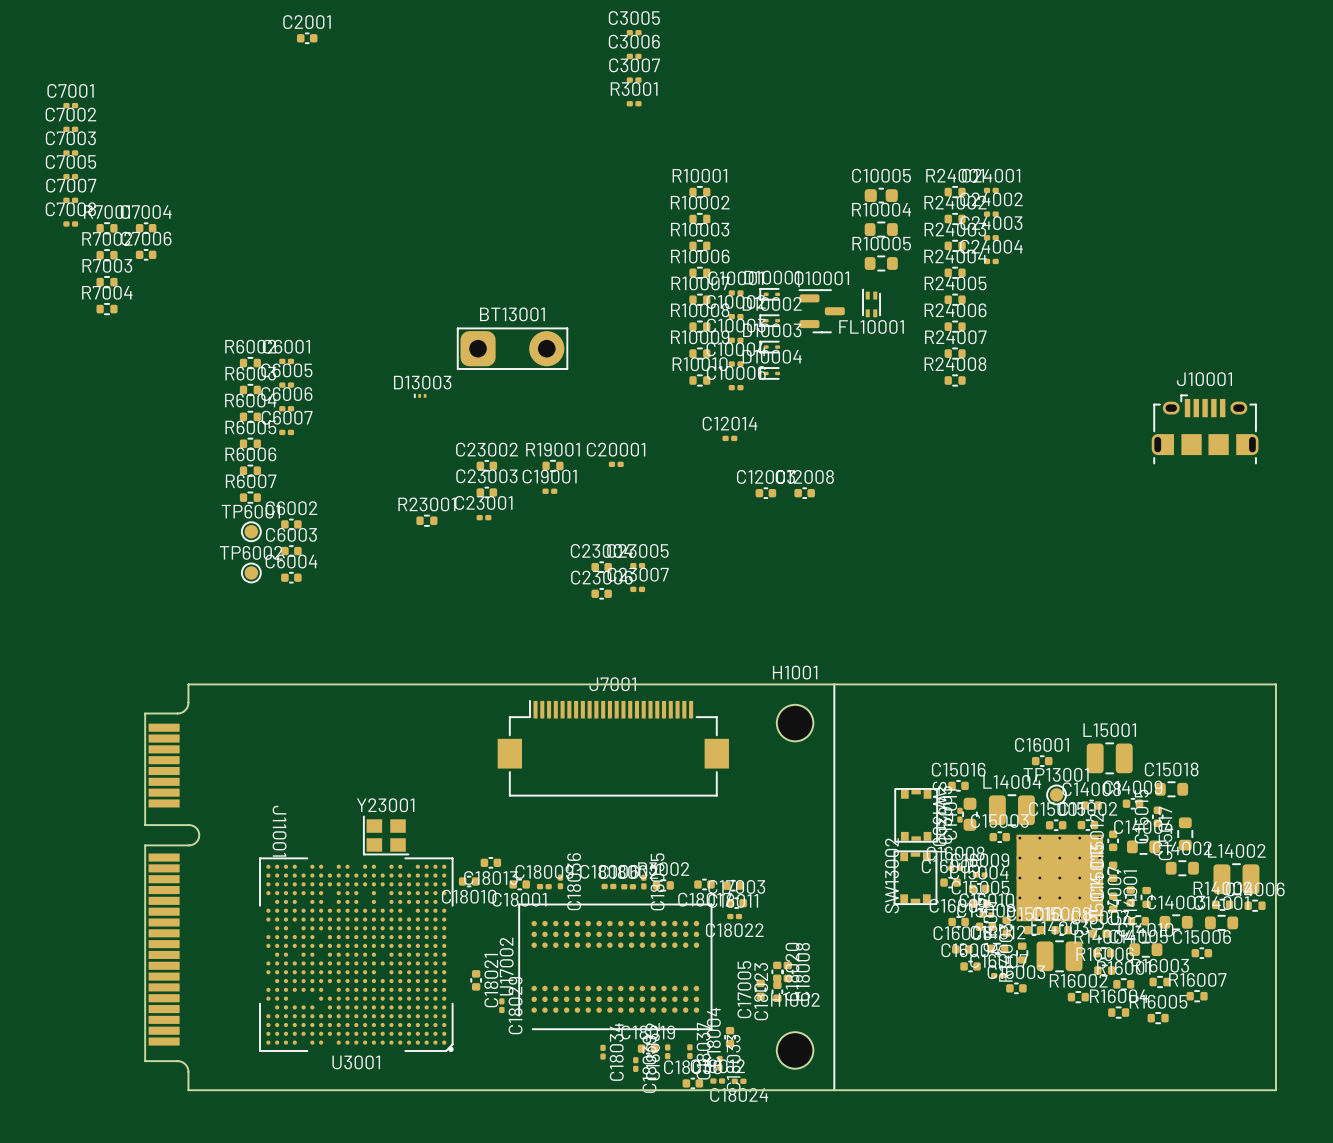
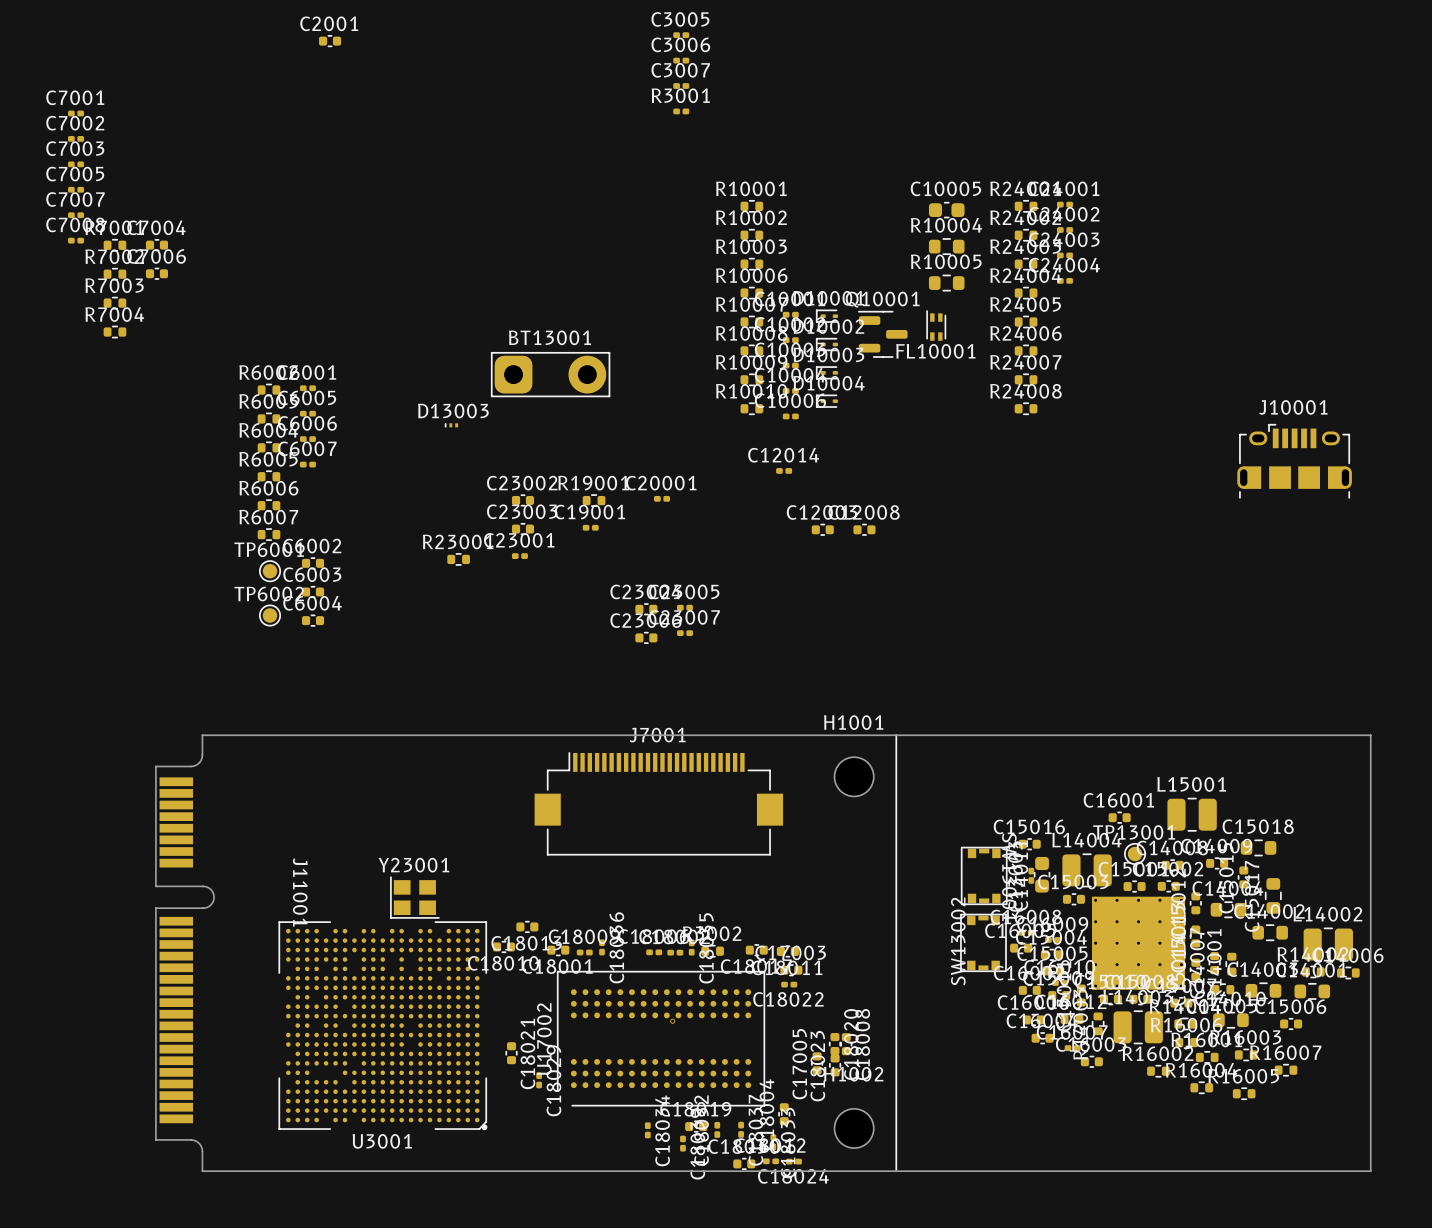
via: none -> (672, 1021)

